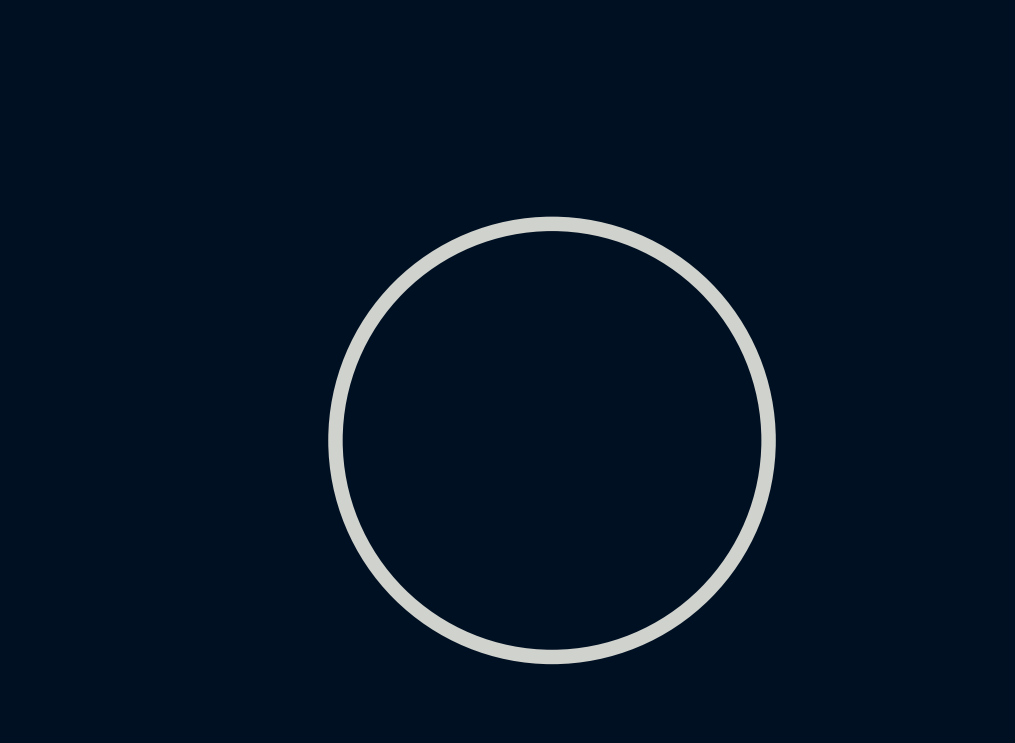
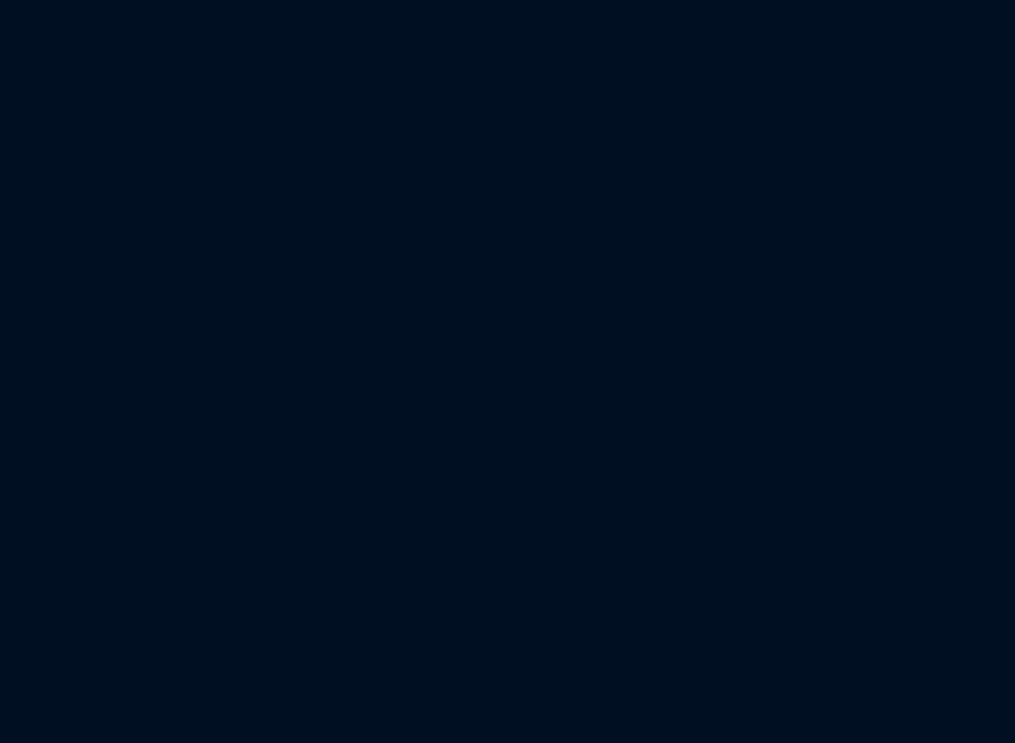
round board edge: [328, 216, 776, 665] -> none

